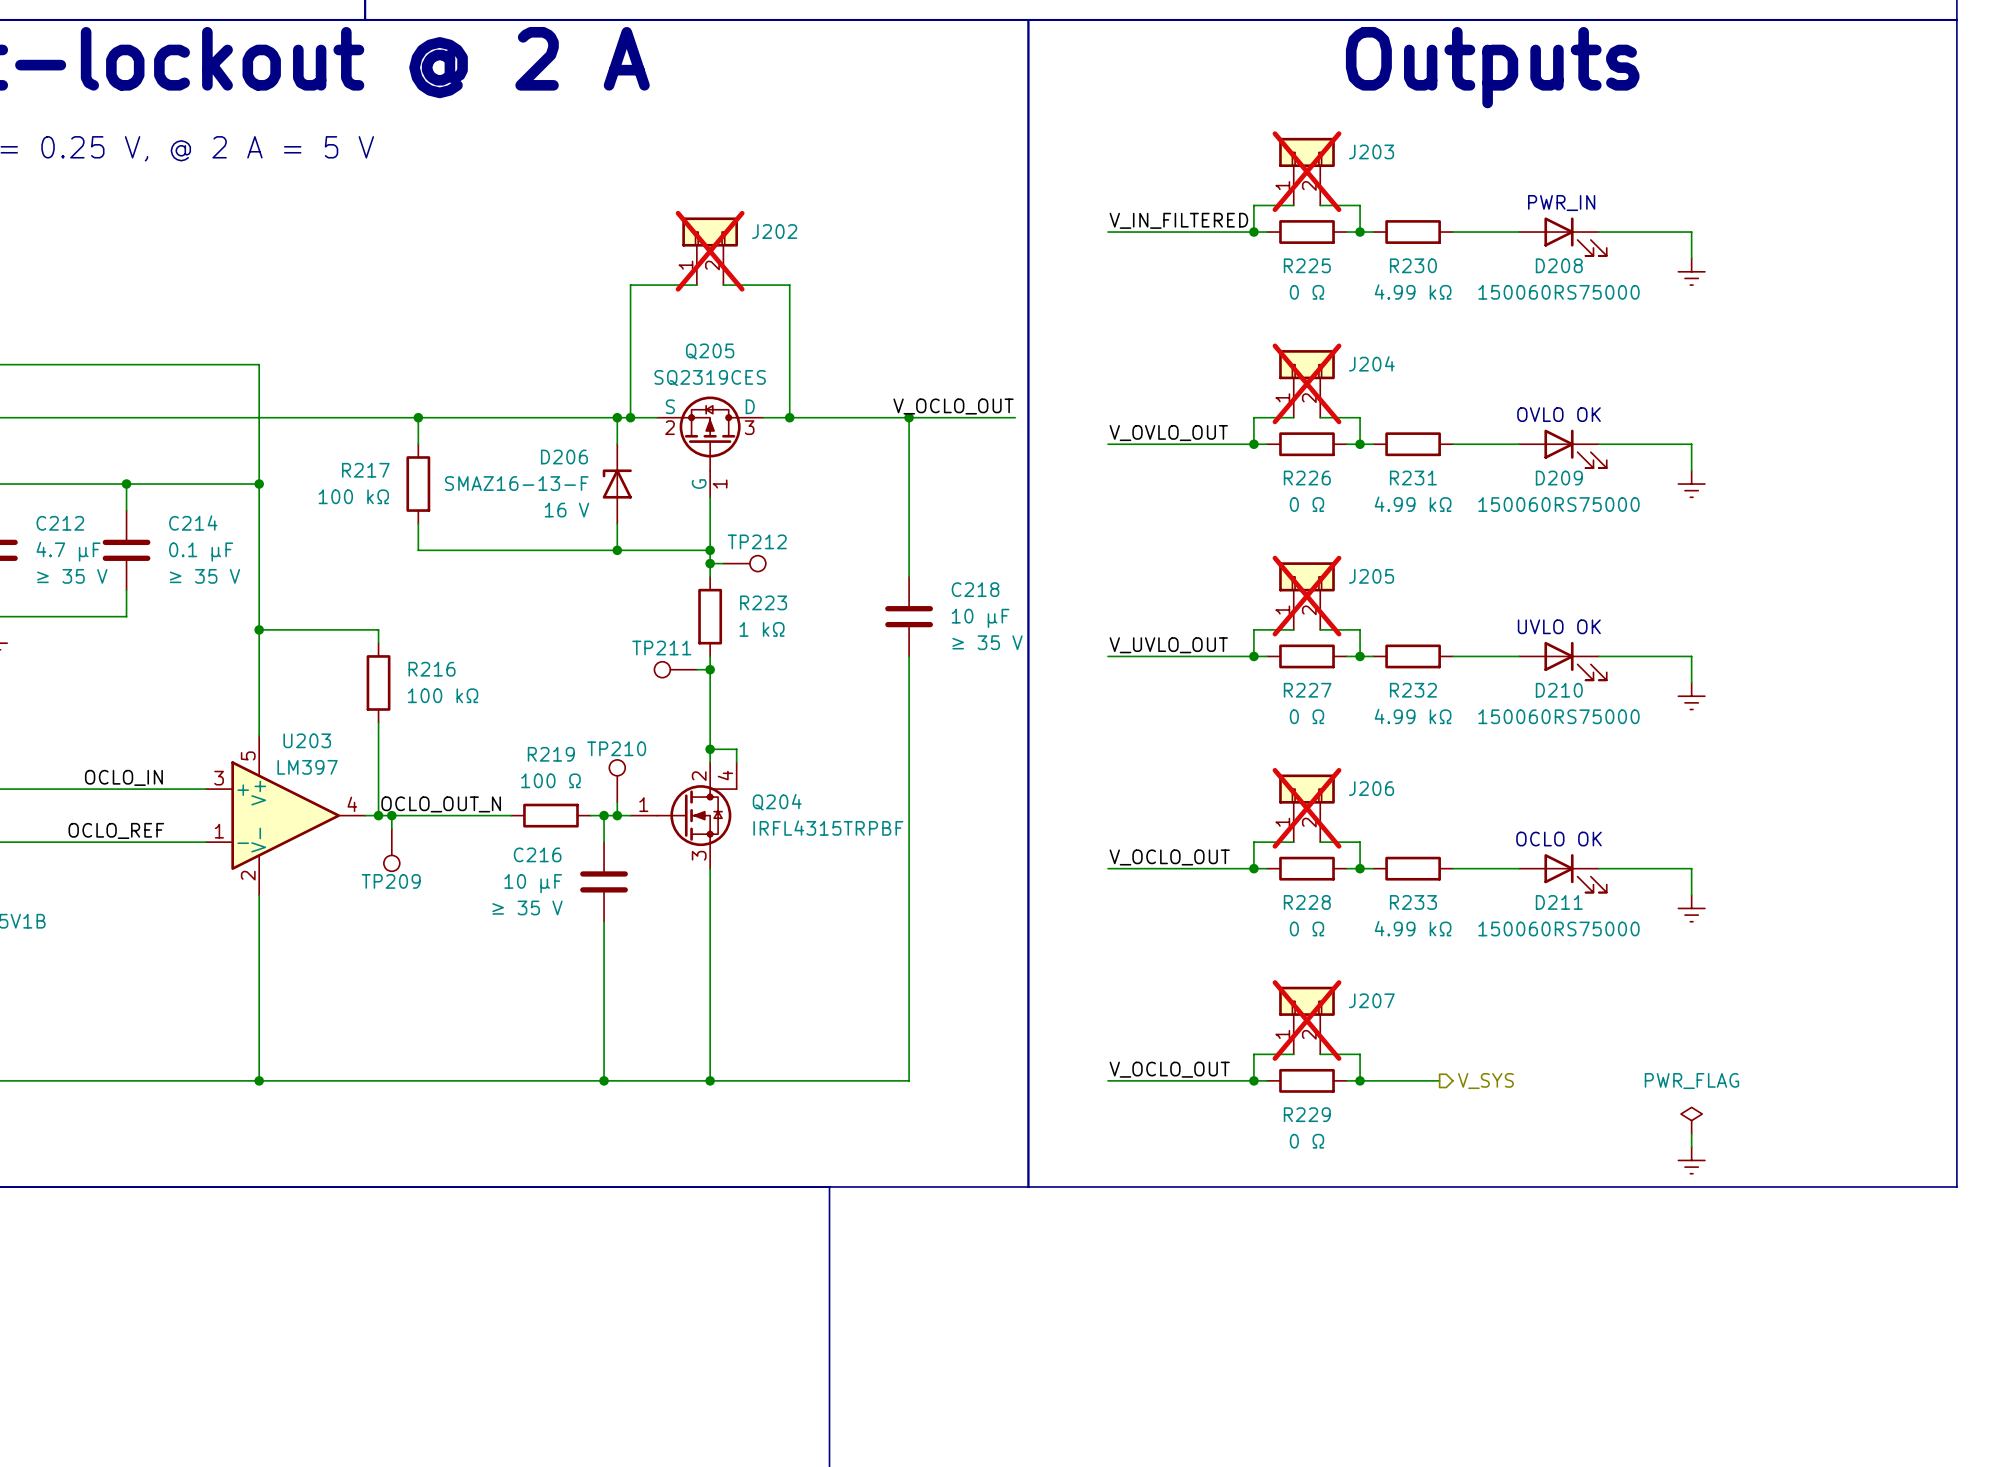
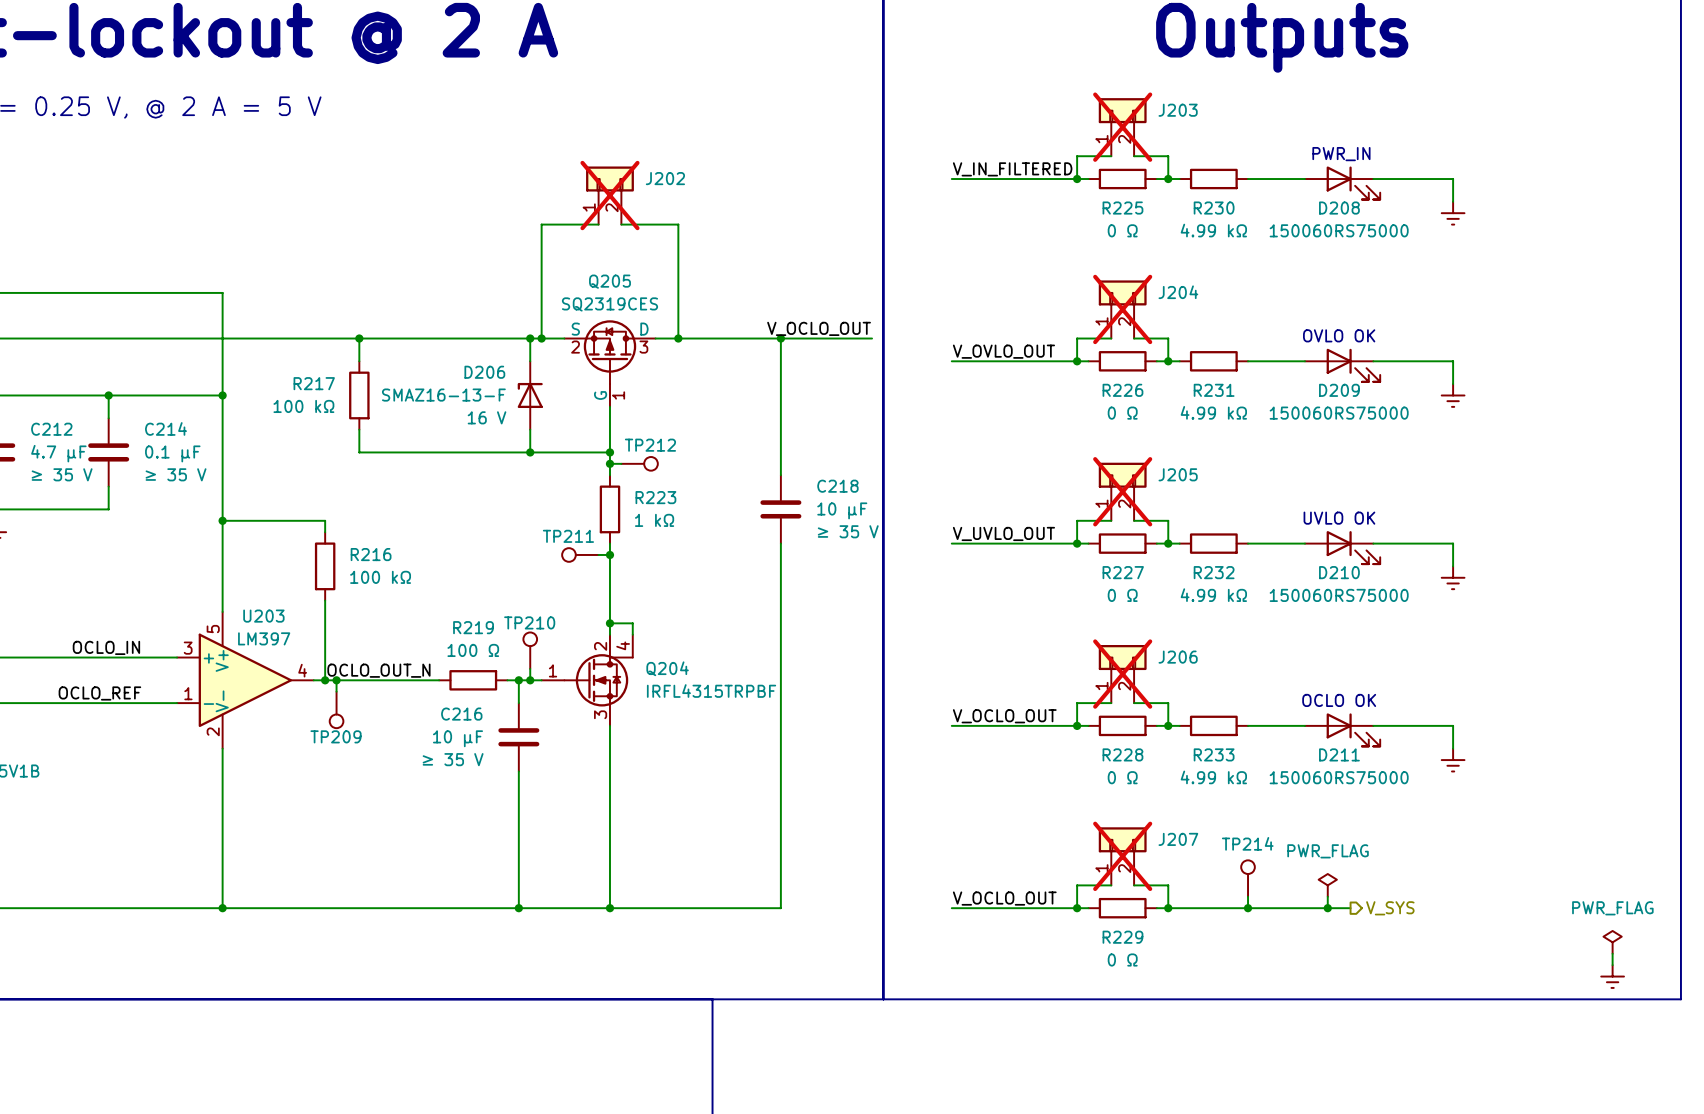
TP214: none -> (1248, 878)
power symbol: none -> PWR_FLAG (1327, 885)
wire: none -> (1248, 896) (1248, 908)
wire: none -> (1236, 908) (1350, 908)
junction: none -> (1248, 908)
junction: none -> (1327, 908)
hierarchical label position: V_SYS (1485, 1081) -> V_SYS (1390, 908)
power symbol: PWR_FLAG (1691, 1120) -> none
power symbol: none -> PWR_FLAG (1612, 942)
wire: (1691, 1133) (1691, 1147) -> (1327, 896) (1327, 908)
wire: none -> (1612, 953) (1612, 965)
power symbol position: (1691, 1160) -> (1612, 976)

